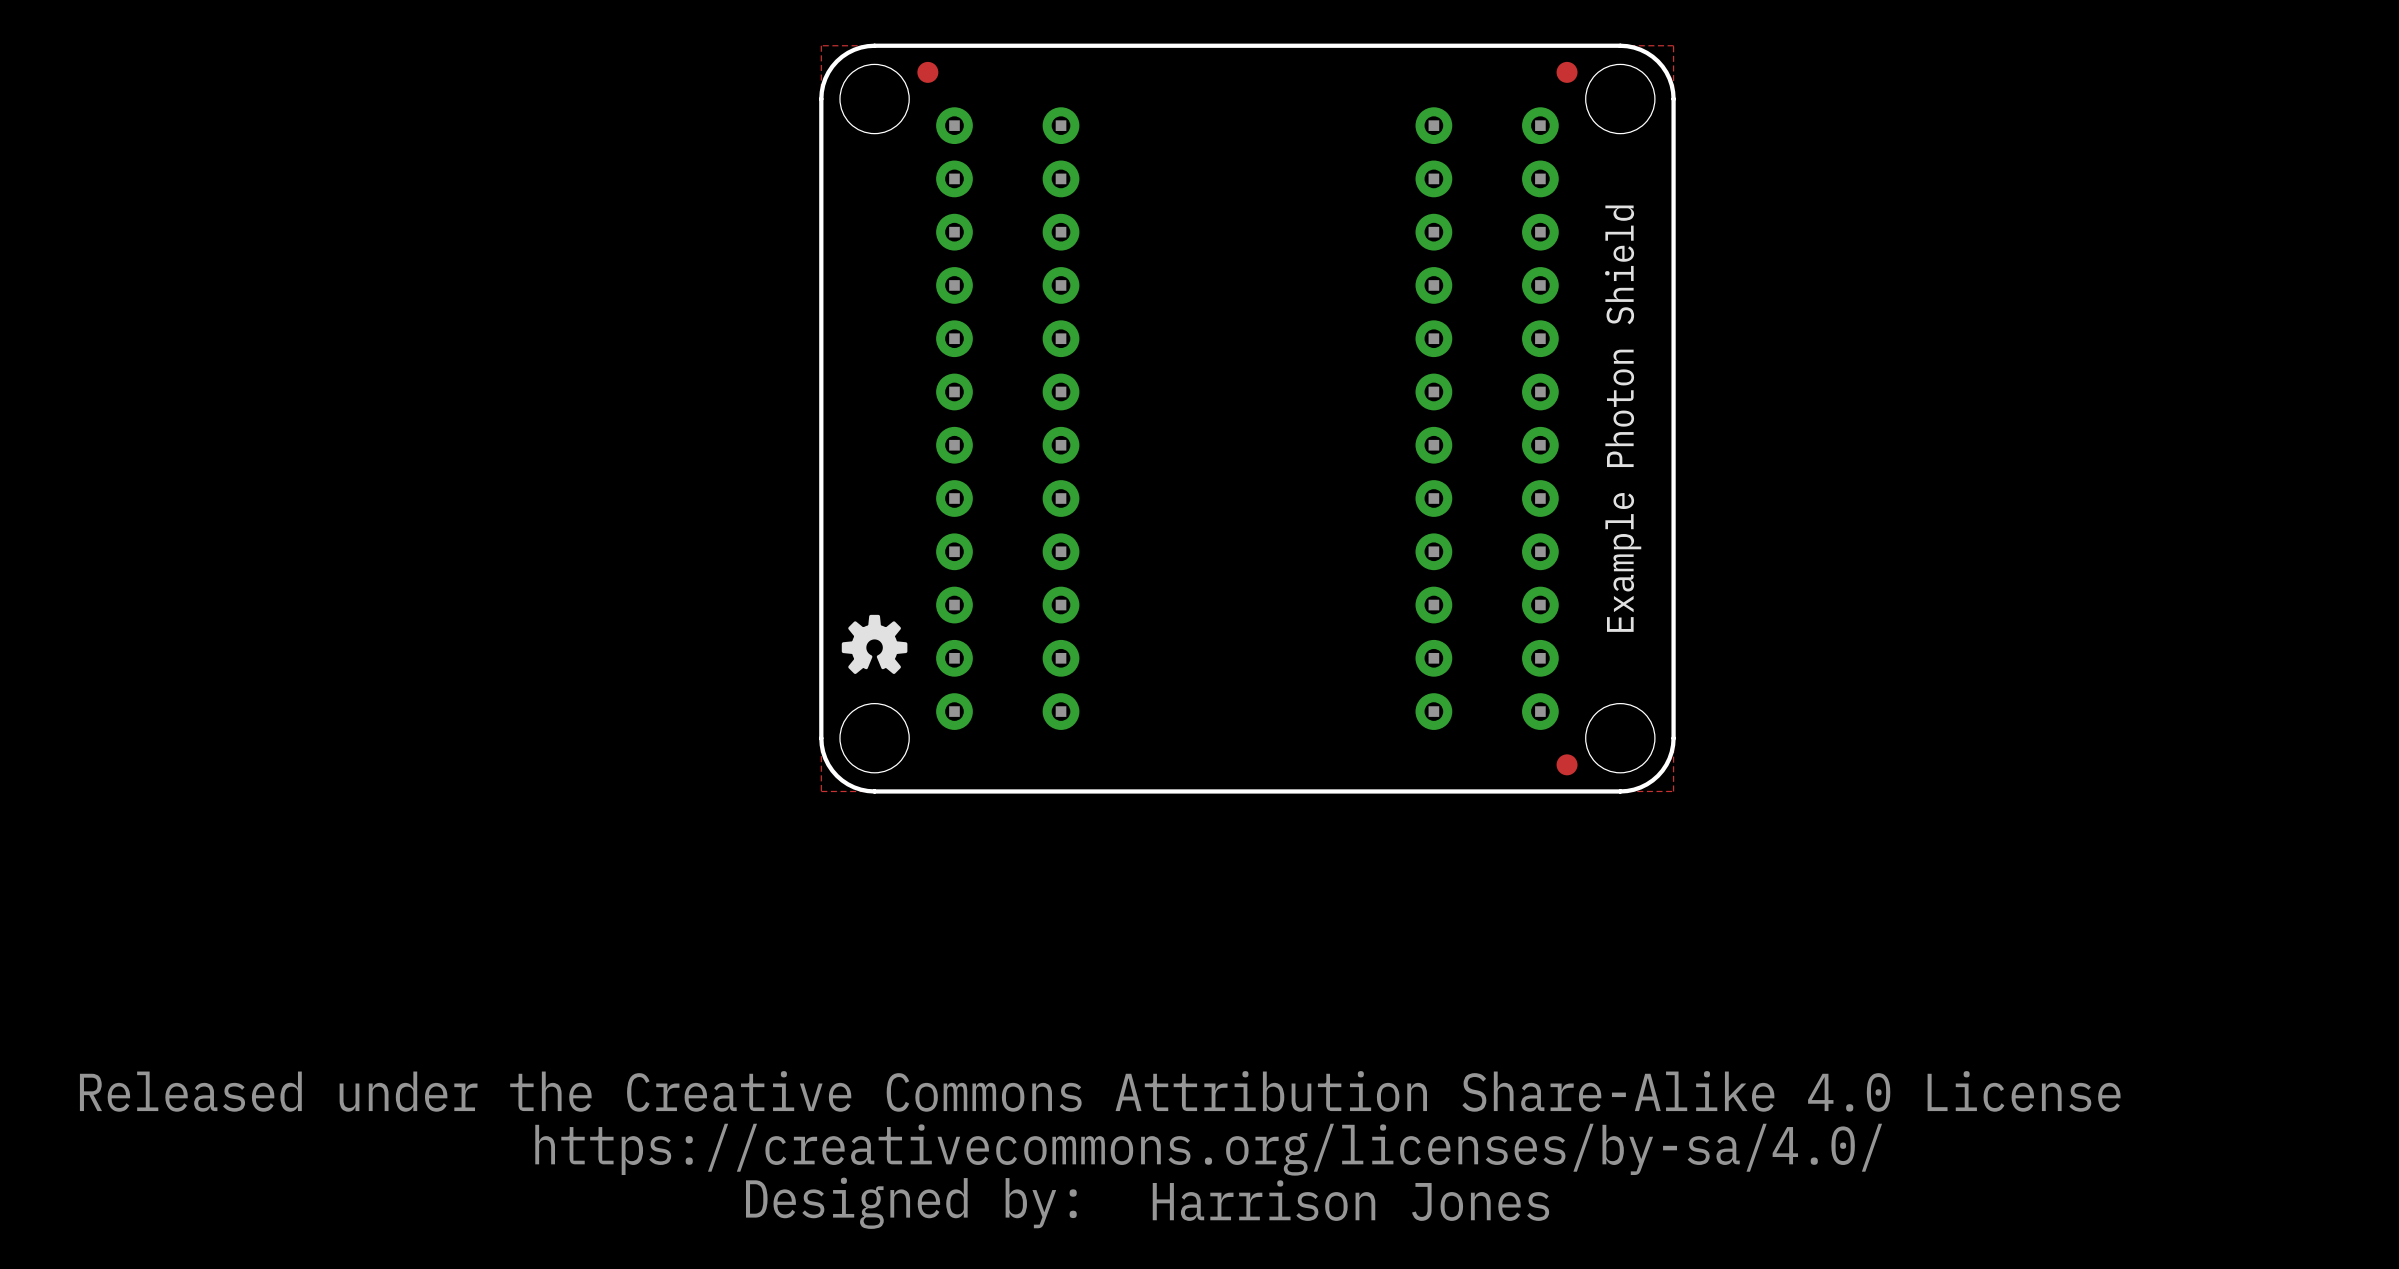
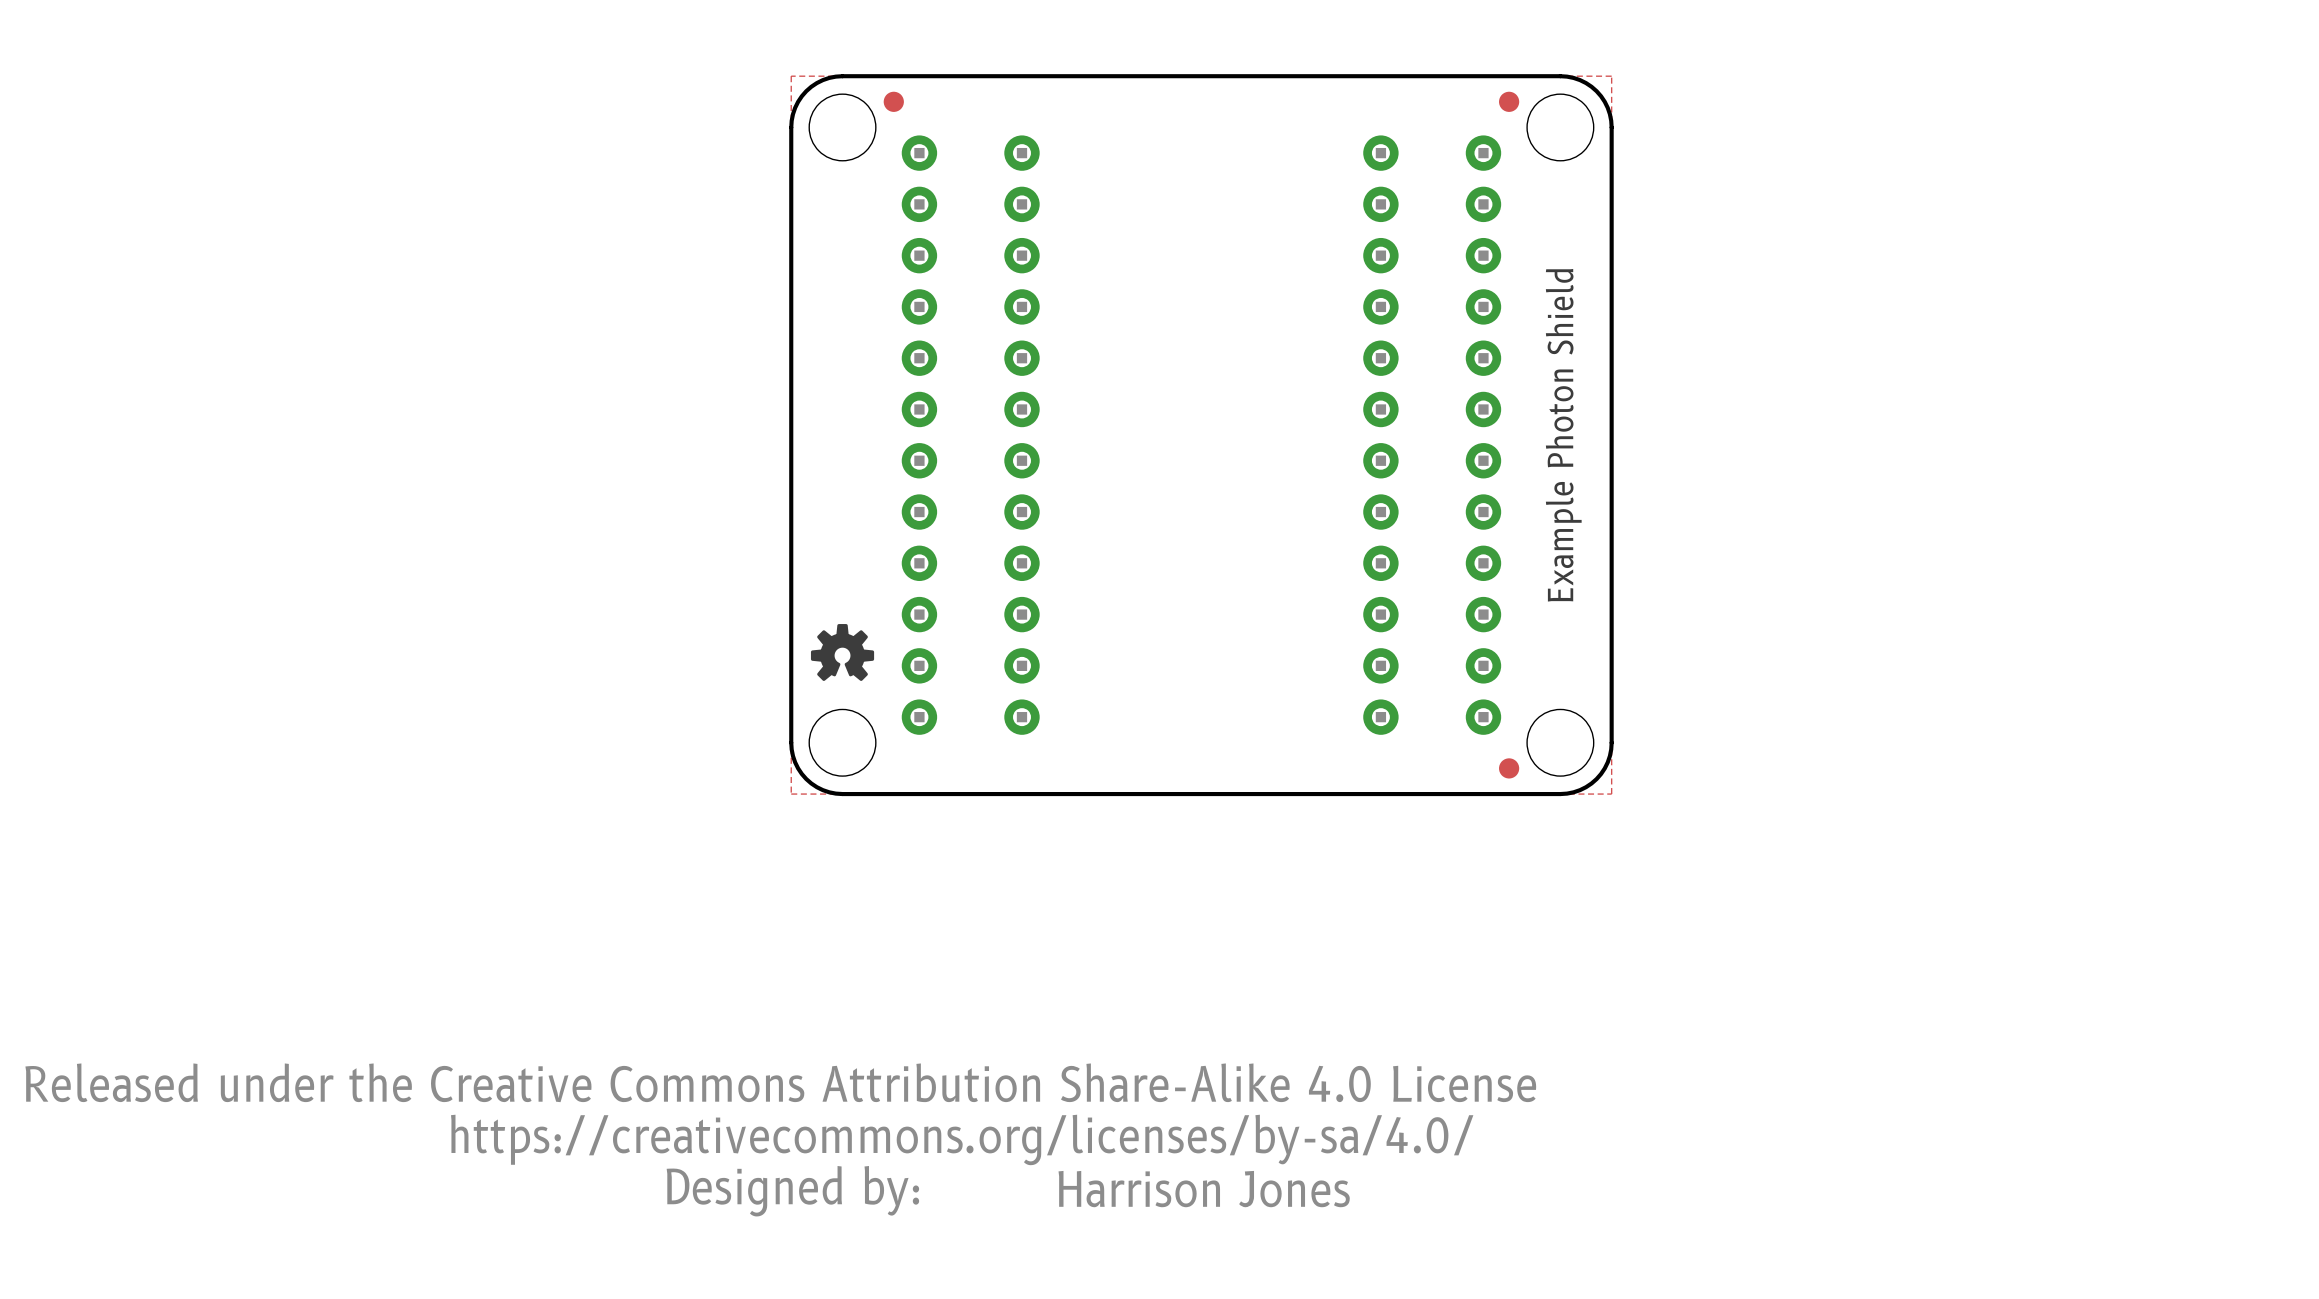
drawing position: (1100, 1150) -> (780, 1139)
text position: Harrison Jones (1350, 1200) -> Harrison Jones (1204, 1189)

